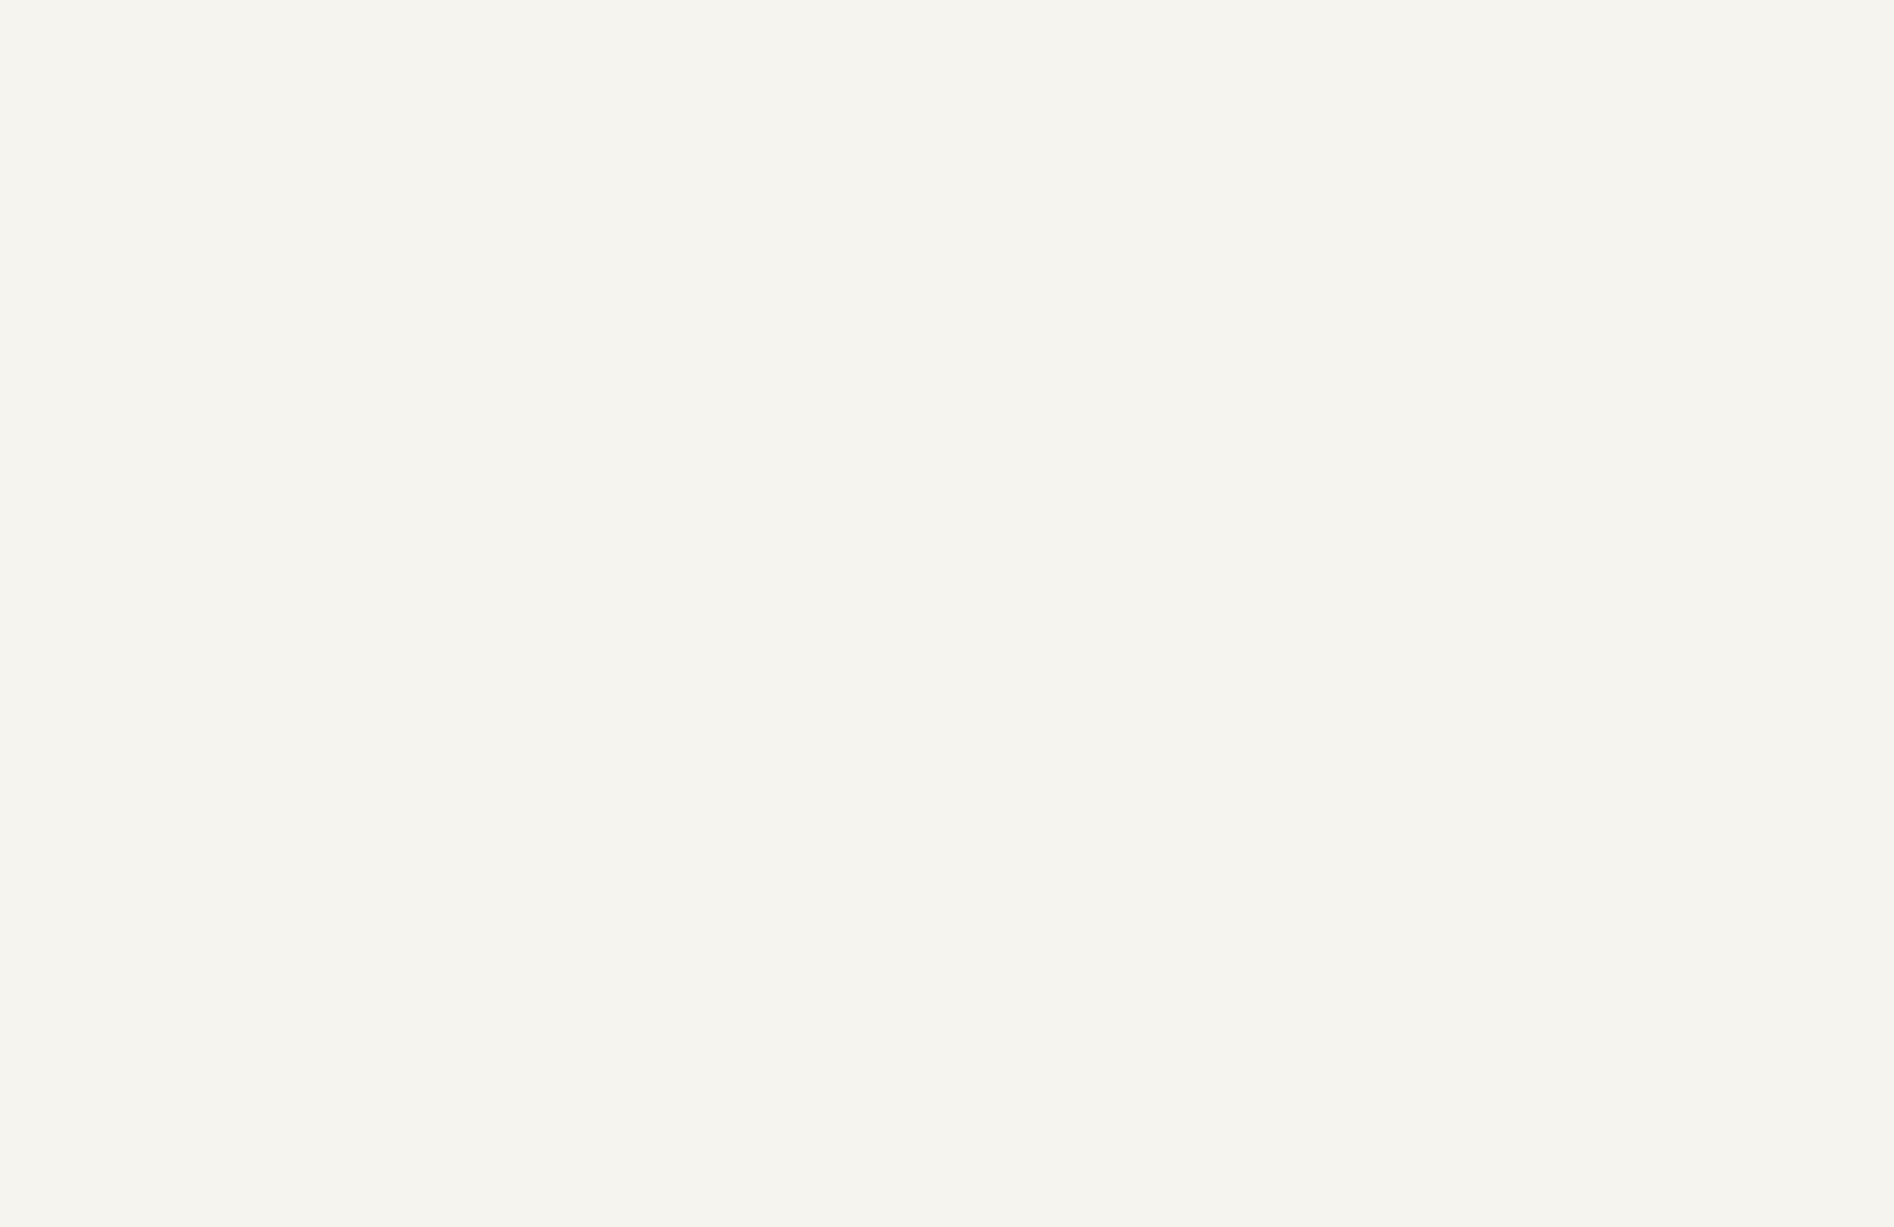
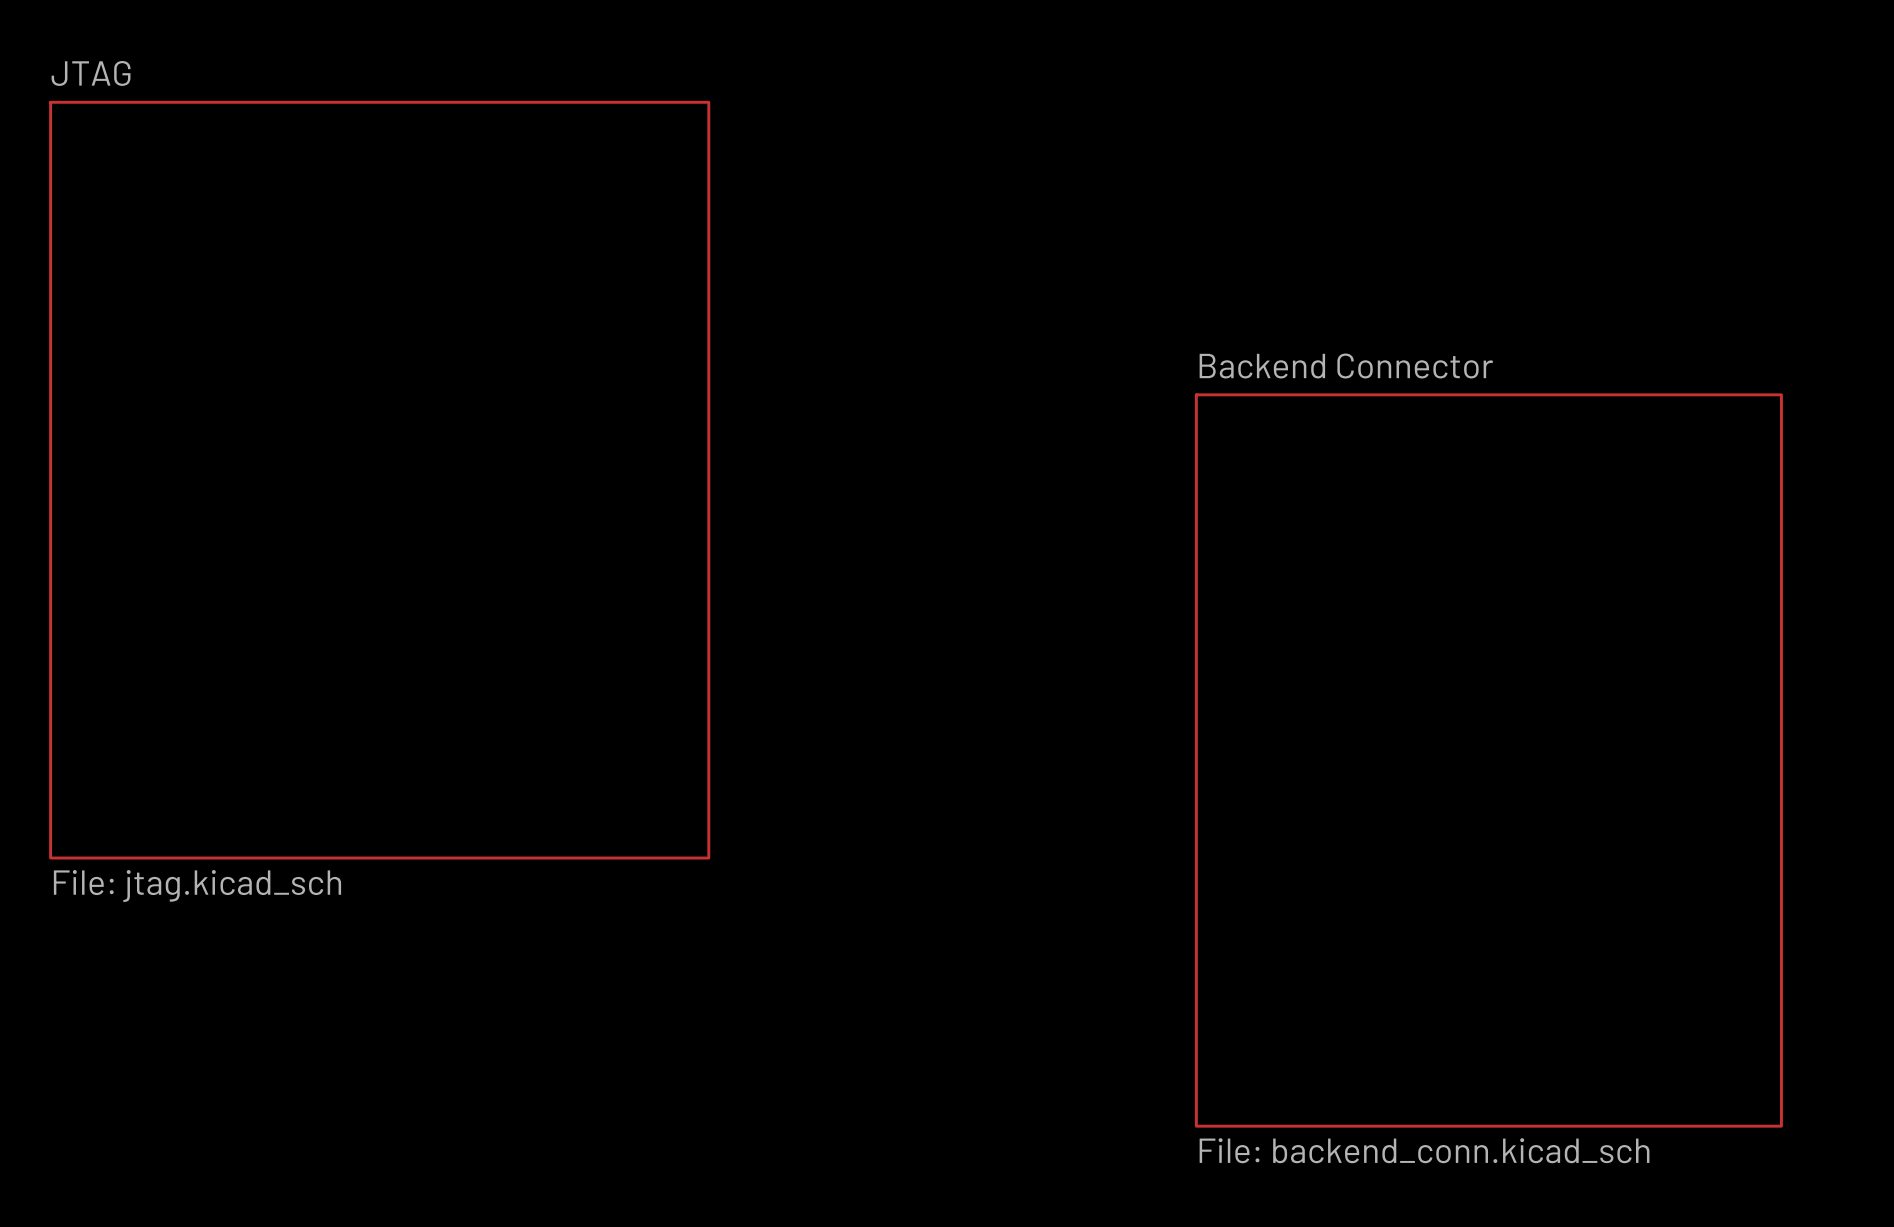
sheet JTAG: none -> File: jtag.kicad_sch (379, 480)
sheet Backend Connector: none -> File: backend_conn.kicad_sch (1488, 760)

